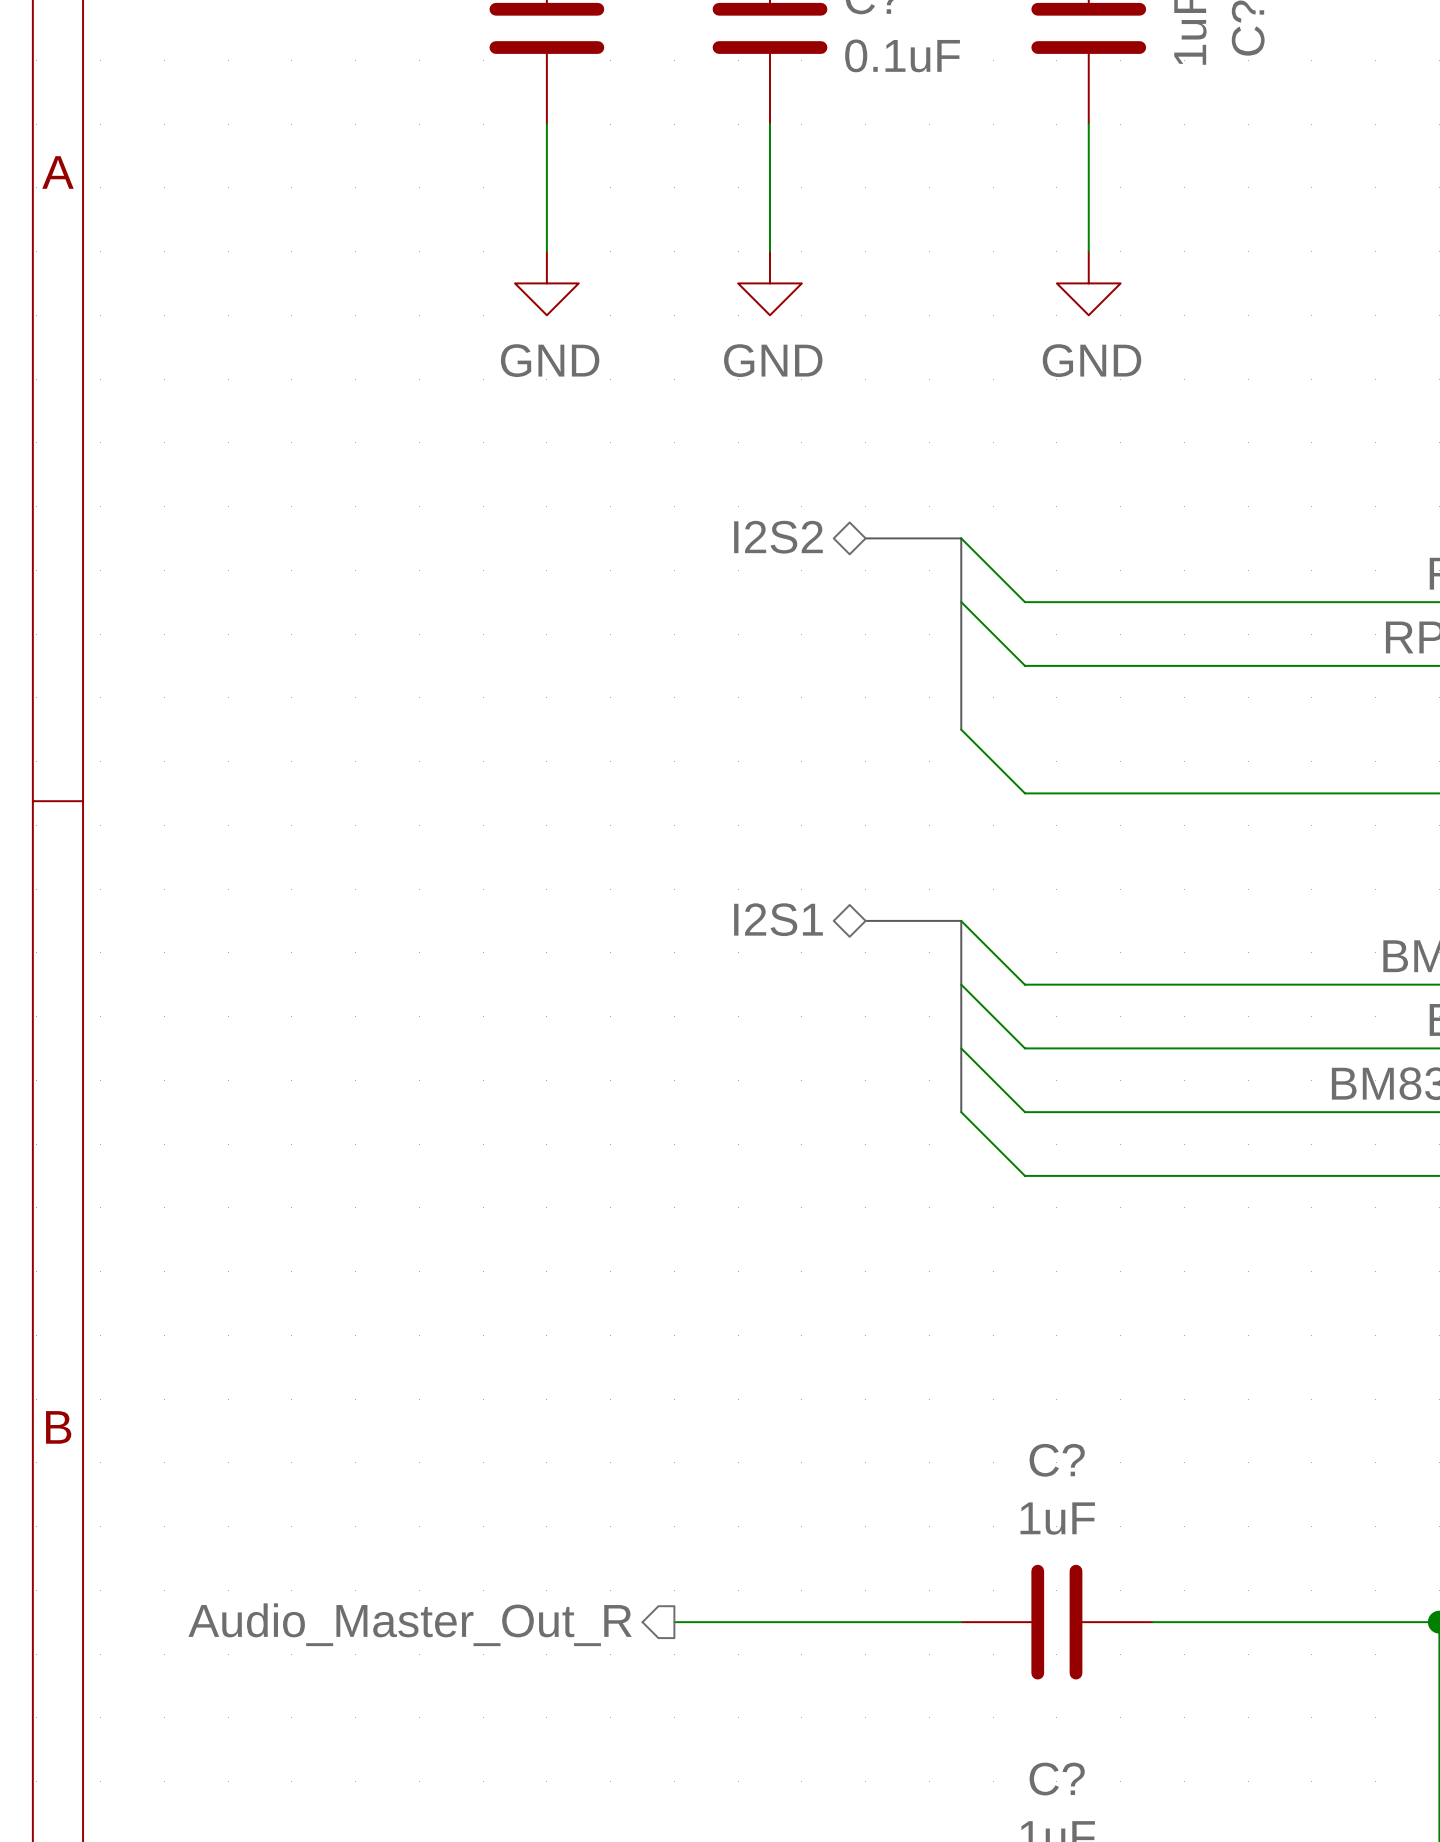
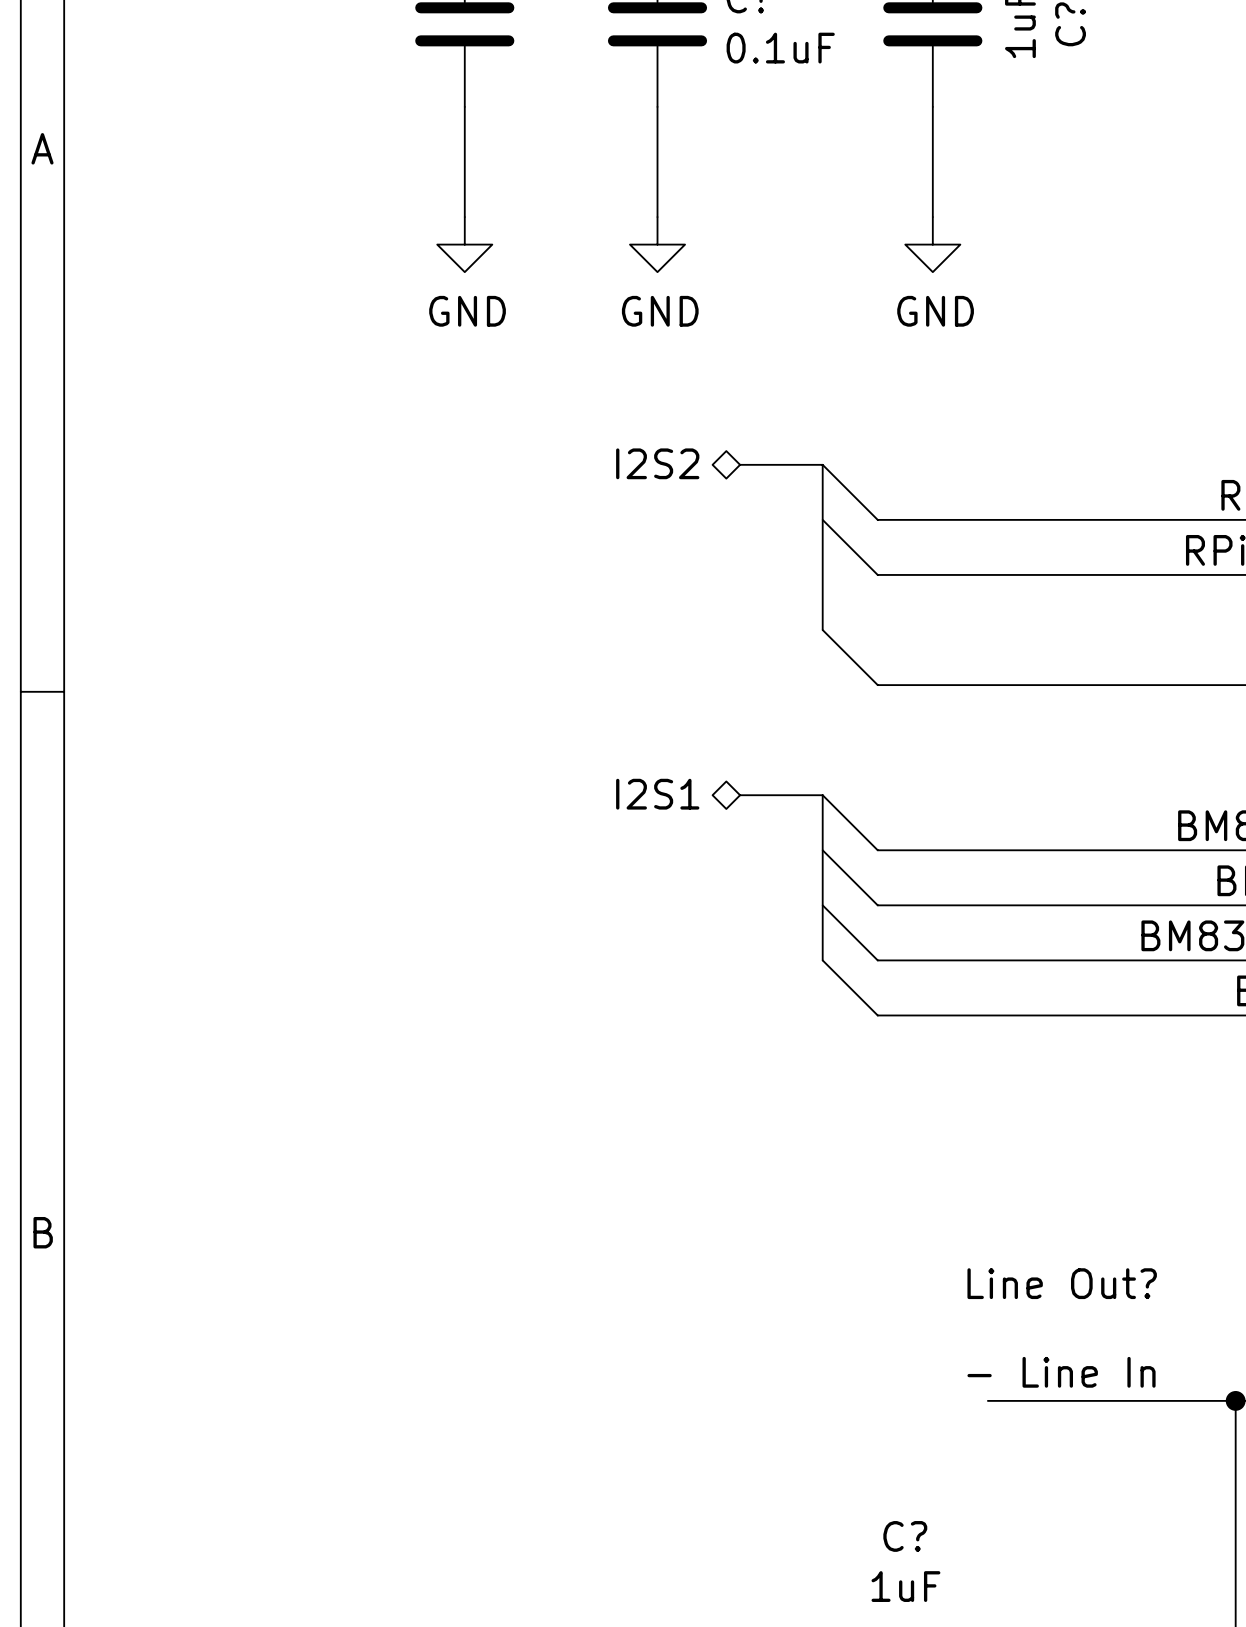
text: none -> Line Out? (1062, 1283)
text: none -> - Line In (1061, 1372)
wire: (674, 1622) (961, 1622) -> none
C?: 1uF (1056, 1622) -> none
hierarchical label: Audio_Master_Out_R (410, 1624) -> none

